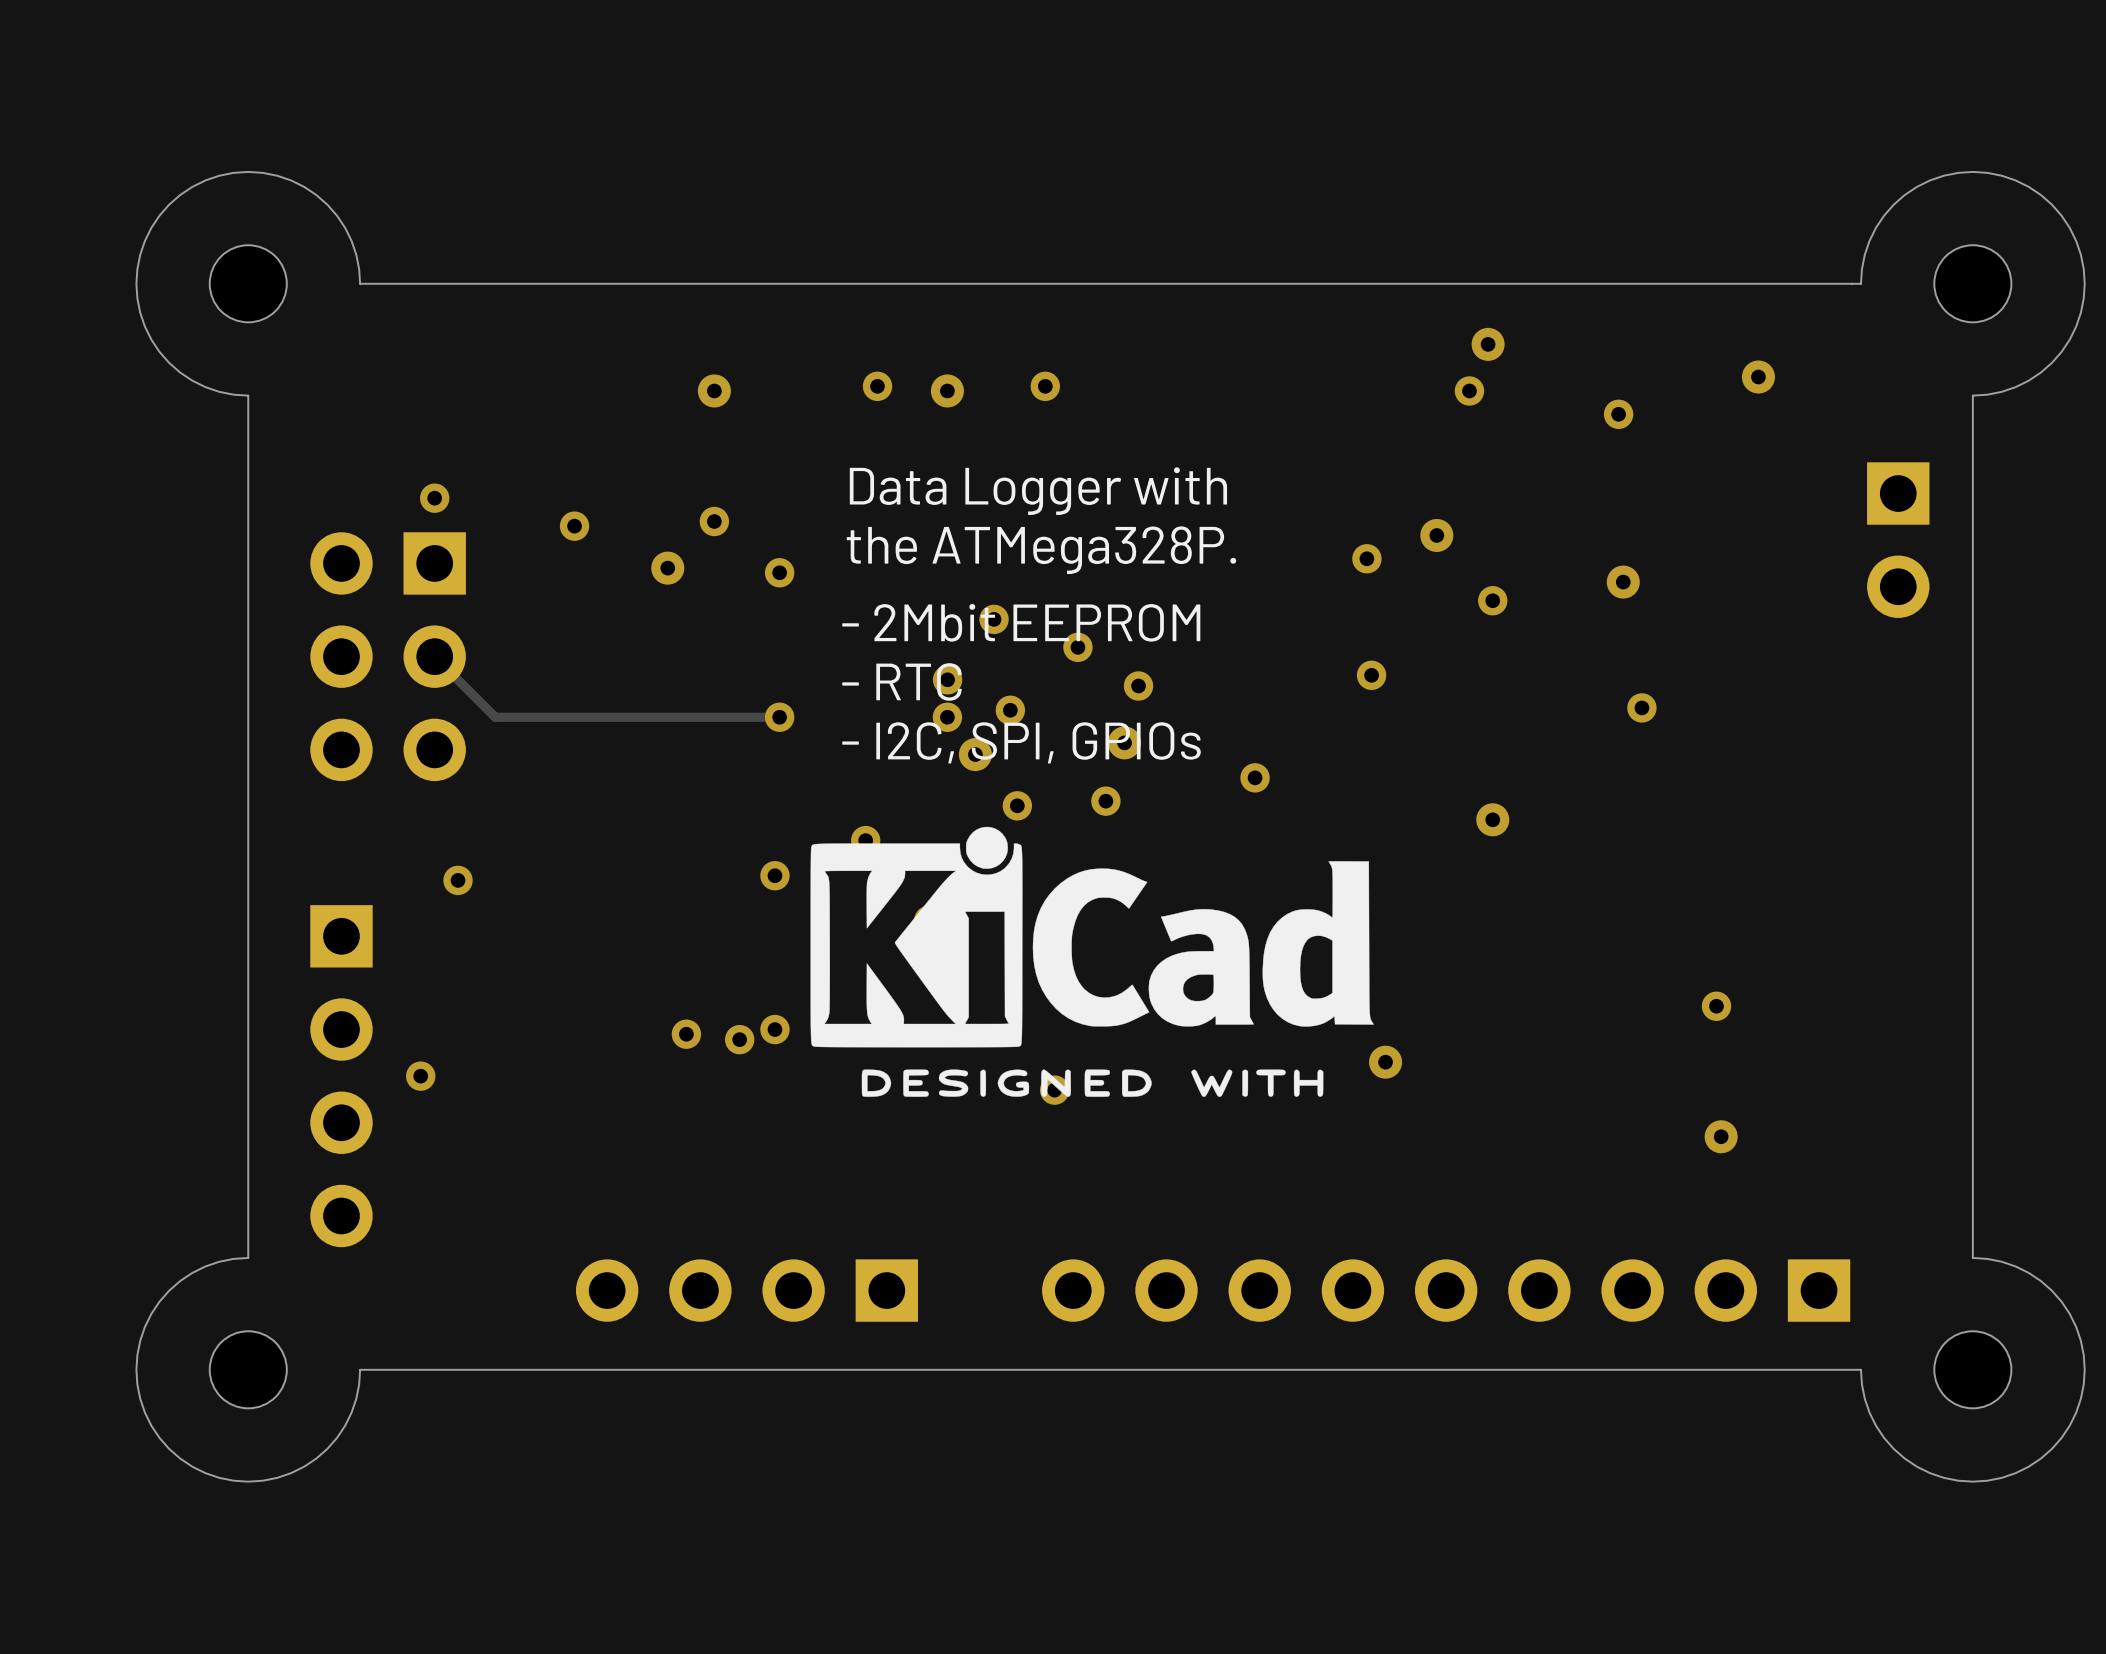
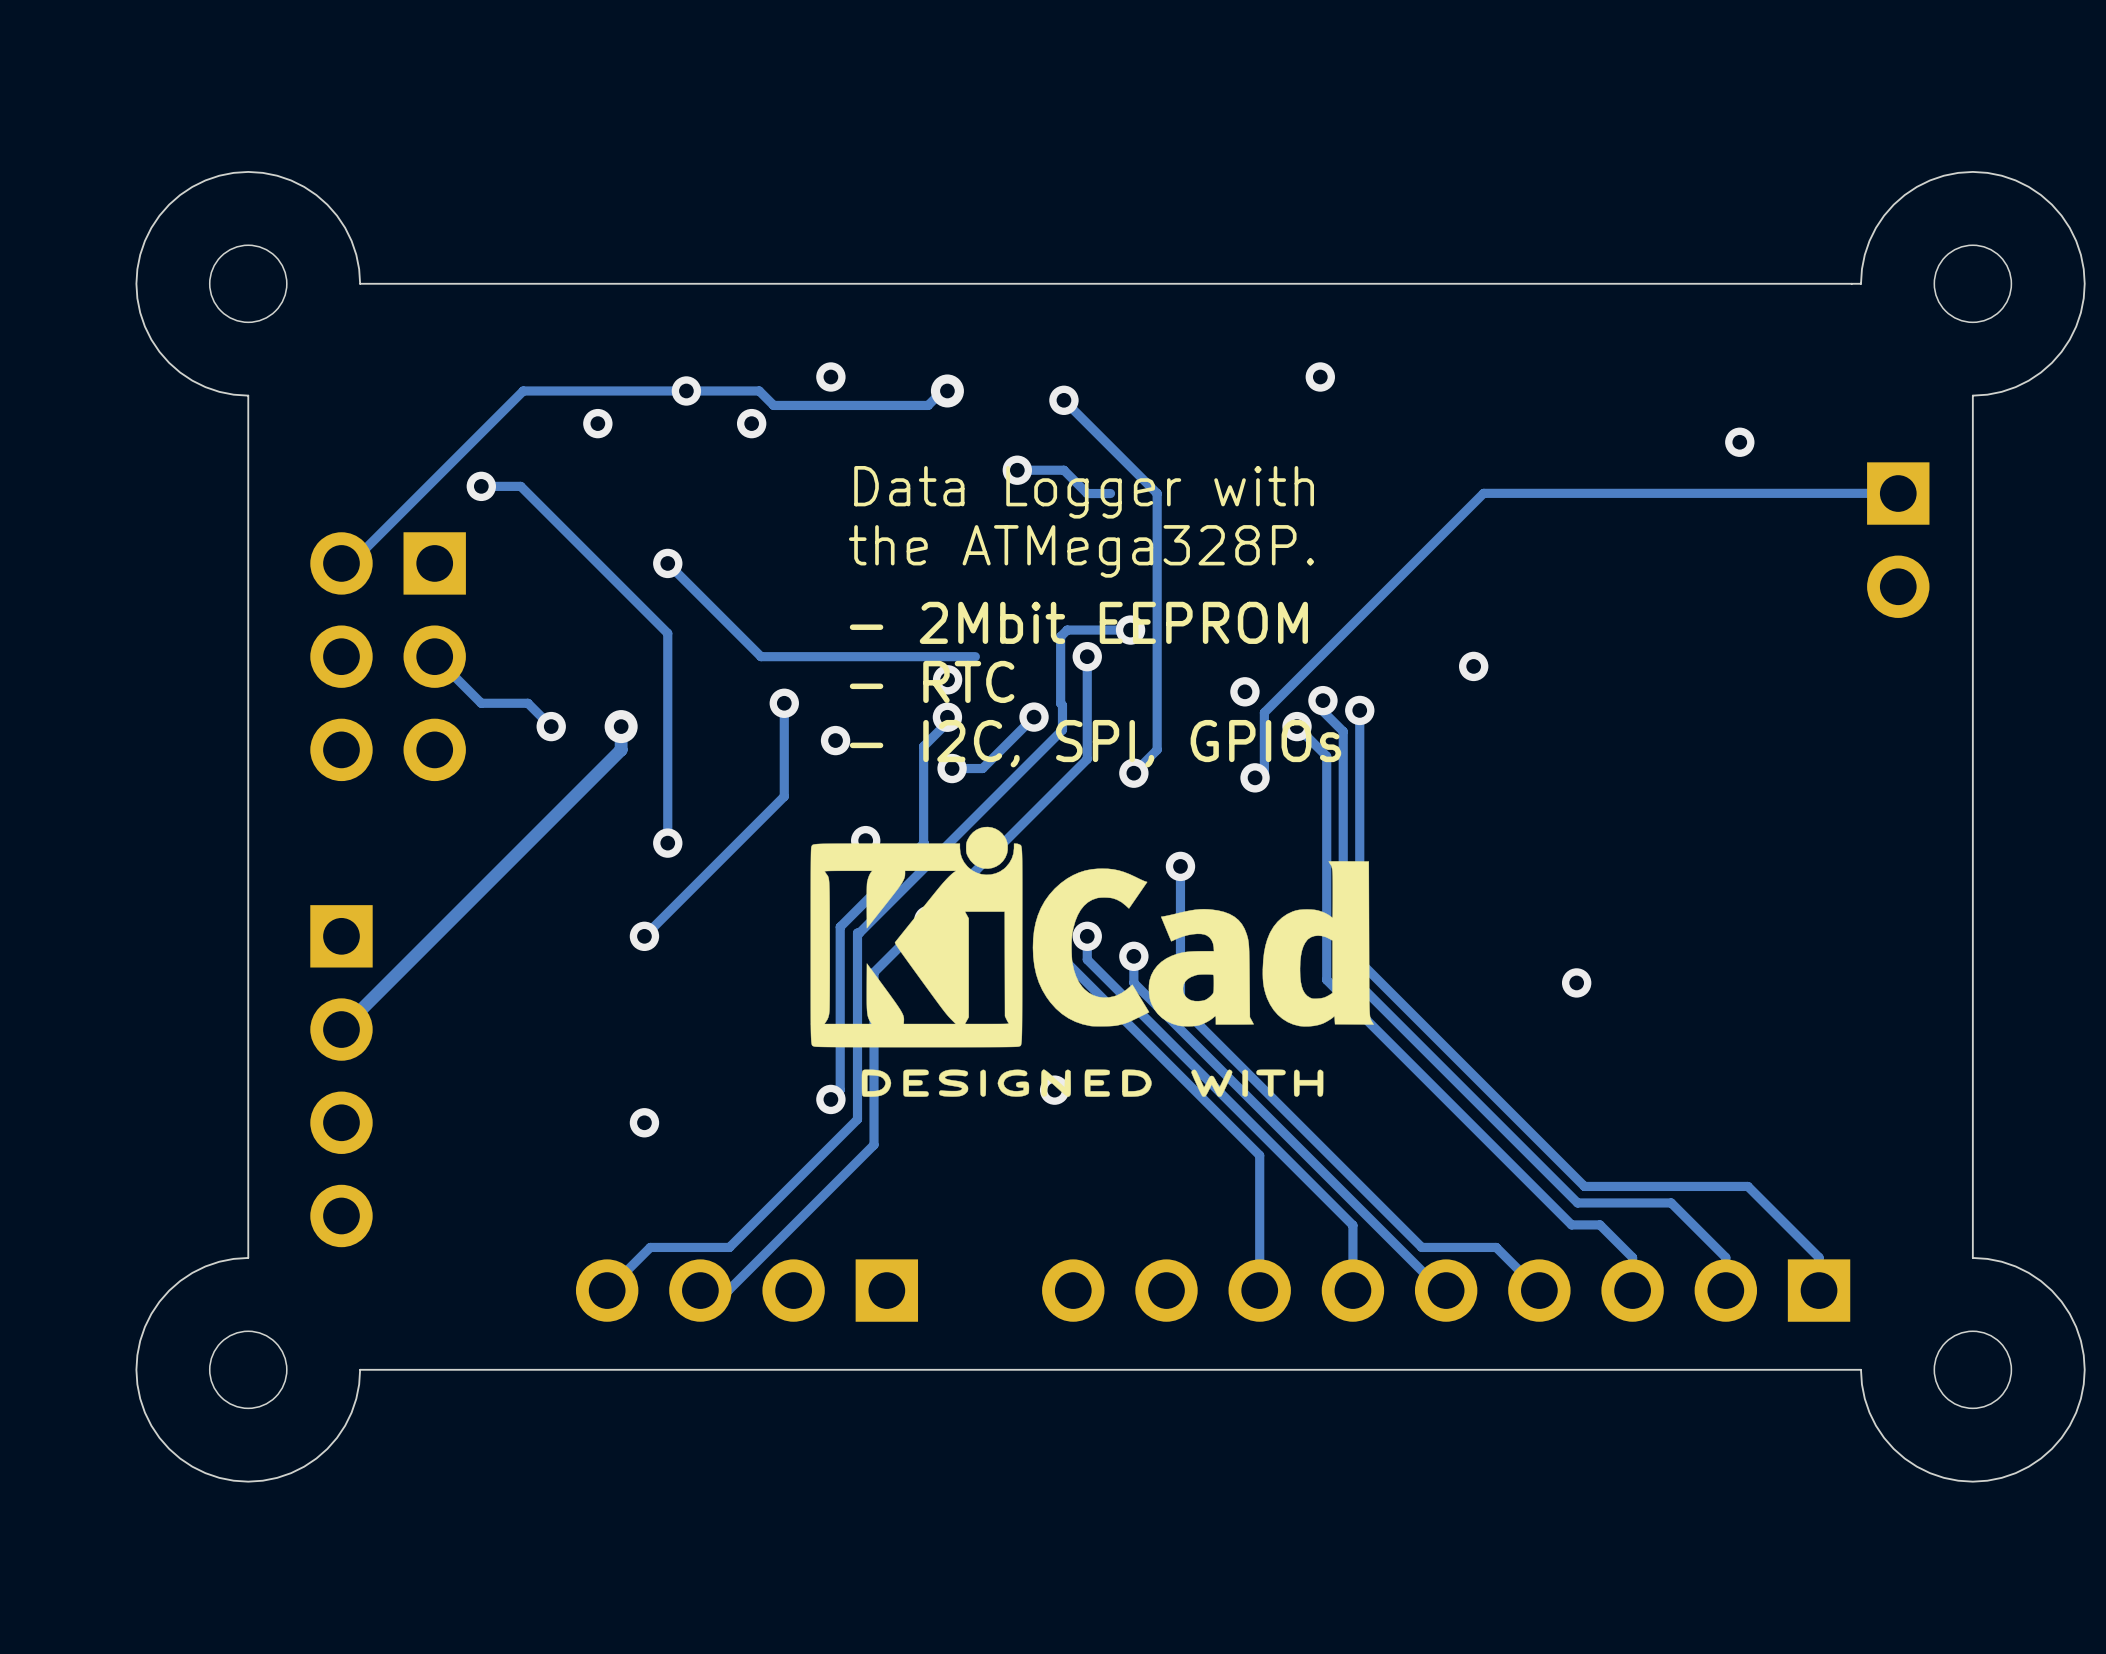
via: (1488, 344) -> none
via: none -> (1320, 377)
via: (1758, 377) -> none
via position: (877, 386) -> (830, 377)
track: none -> (947, 386) (928, 405) (773, 405) (759, 390) (523, 390) (350, 563) (341, 563)
via position: (1045, 386) -> (1063, 400)
via position: (714, 390) -> (686, 390)
via: (1469, 390) -> none
track: none -> (1063, 400) (1157, 493) (1157, 749) (1133, 773)
via position: (1618, 414) -> (1739, 442)
via: none -> (597, 423)
via: none -> (751, 423)
track: none -> (1017, 470) (1063, 470) (1087, 493) (1110, 493)
via: none -> (1017, 470)
track: none -> (481, 486) (520, 486) (667, 633) (667, 843)
track: none -> (1898, 493) (1483, 493) (1264, 712) (1264, 773)
via position: (434, 498) -> (481, 486)
via: (714, 521) -> none
via: (574, 526) -> none
via: (1436, 535) -> none
via: (1366, 558) -> none
track: none -> (667, 563) (760, 656) (975, 656)
via: none -> (667, 563)
via position: (667, 568) -> (621, 726)
via: (779, 572) -> none
via: (1623, 582) -> none
via: (1492, 600) -> none
via: (994, 619) -> none
via: none -> (1130, 630)
track: none -> (1133, 633) (1130, 630) (1067, 630) (1060, 636) (1062, 729) (857, 933) (857, 1119) (729, 1247) (650, 1247) (607, 1290)
via position: (1077, 647) -> (1087, 656)
track: none -> (1087, 656) (1087, 759) (874, 972) (874, 1144) (728, 1290) (700, 1290)
via: none -> (1473, 666)
via: (1371, 675) -> none
via: (1138, 685) -> none
via: none -> (1244, 691)
track: none -> (1322, 700) (1322, 711) (1343, 731) (1343, 968) (1577, 1202) (1671, 1202) (1725, 1257) (1725, 1290)
via: none -> (1322, 700)
track: (481, 703) (495, 717) (779, 717) -> (481, 703) (527, 703) (551, 726)
track: none -> (784, 703) (784, 796) (644, 936)
via: (1641, 707) -> none
via position: (1010, 710) -> (1034, 717)
track: none -> (1359, 710) (1359, 961) (1584, 1186) (1747, 1186) (1819, 1257) (1819, 1290)
via: none -> (1359, 710)
via position: (779, 717) -> (784, 703)
track: none -> (952, 717) (923, 746) (923, 842)
track: none -> (1034, 717) (982, 768) (952, 768)
via: none -> (551, 726)
track: none -> (621, 726) (621, 749) (341, 1029)
track: none -> (1297, 726) (1326, 756) (1326, 980) (1571, 1224) (1599, 1224) (1632, 1257) (1632, 1290)
via: none -> (1297, 726)
via: none -> (835, 740)
via: (1124, 742) -> none
via position: (975, 754) -> (952, 768)
via position: (1105, 801) -> (1133, 773)
via: (1017, 805) -> none
via: (1492, 819) -> none
via: none -> (667, 843)
track: none -> (924, 843) (840, 926) (840, 1090) (830, 1099)
track: none -> (1180, 866) (1180, 1006) (1421, 1247) (1496, 1247) (1539, 1290)
via: none -> (1180, 866)
via: (774, 875) -> none
via: (458, 880) -> none
via: none -> (644, 936)
track: none -> (1040, 936) (1259, 1155) (1259, 1290)
track: none -> (1087, 936) (1087, 959) (1352, 1225) (1352, 1290)
via: none -> (1087, 936)
track: none -> (1133, 956) (1133, 982) (1441, 1290) (1446, 1290)
via: none -> (1133, 956)
via: none -> (1576, 982)
via: (1716, 1006) -> none
via: (774, 1029) -> none
via: (686, 1034) -> none
via: (739, 1039) -> none
via: (1385, 1062) -> none
via: (420, 1076) -> none
via: none -> (830, 1099)
via: none -> (644, 1122)
via: (1721, 1136) -> none

